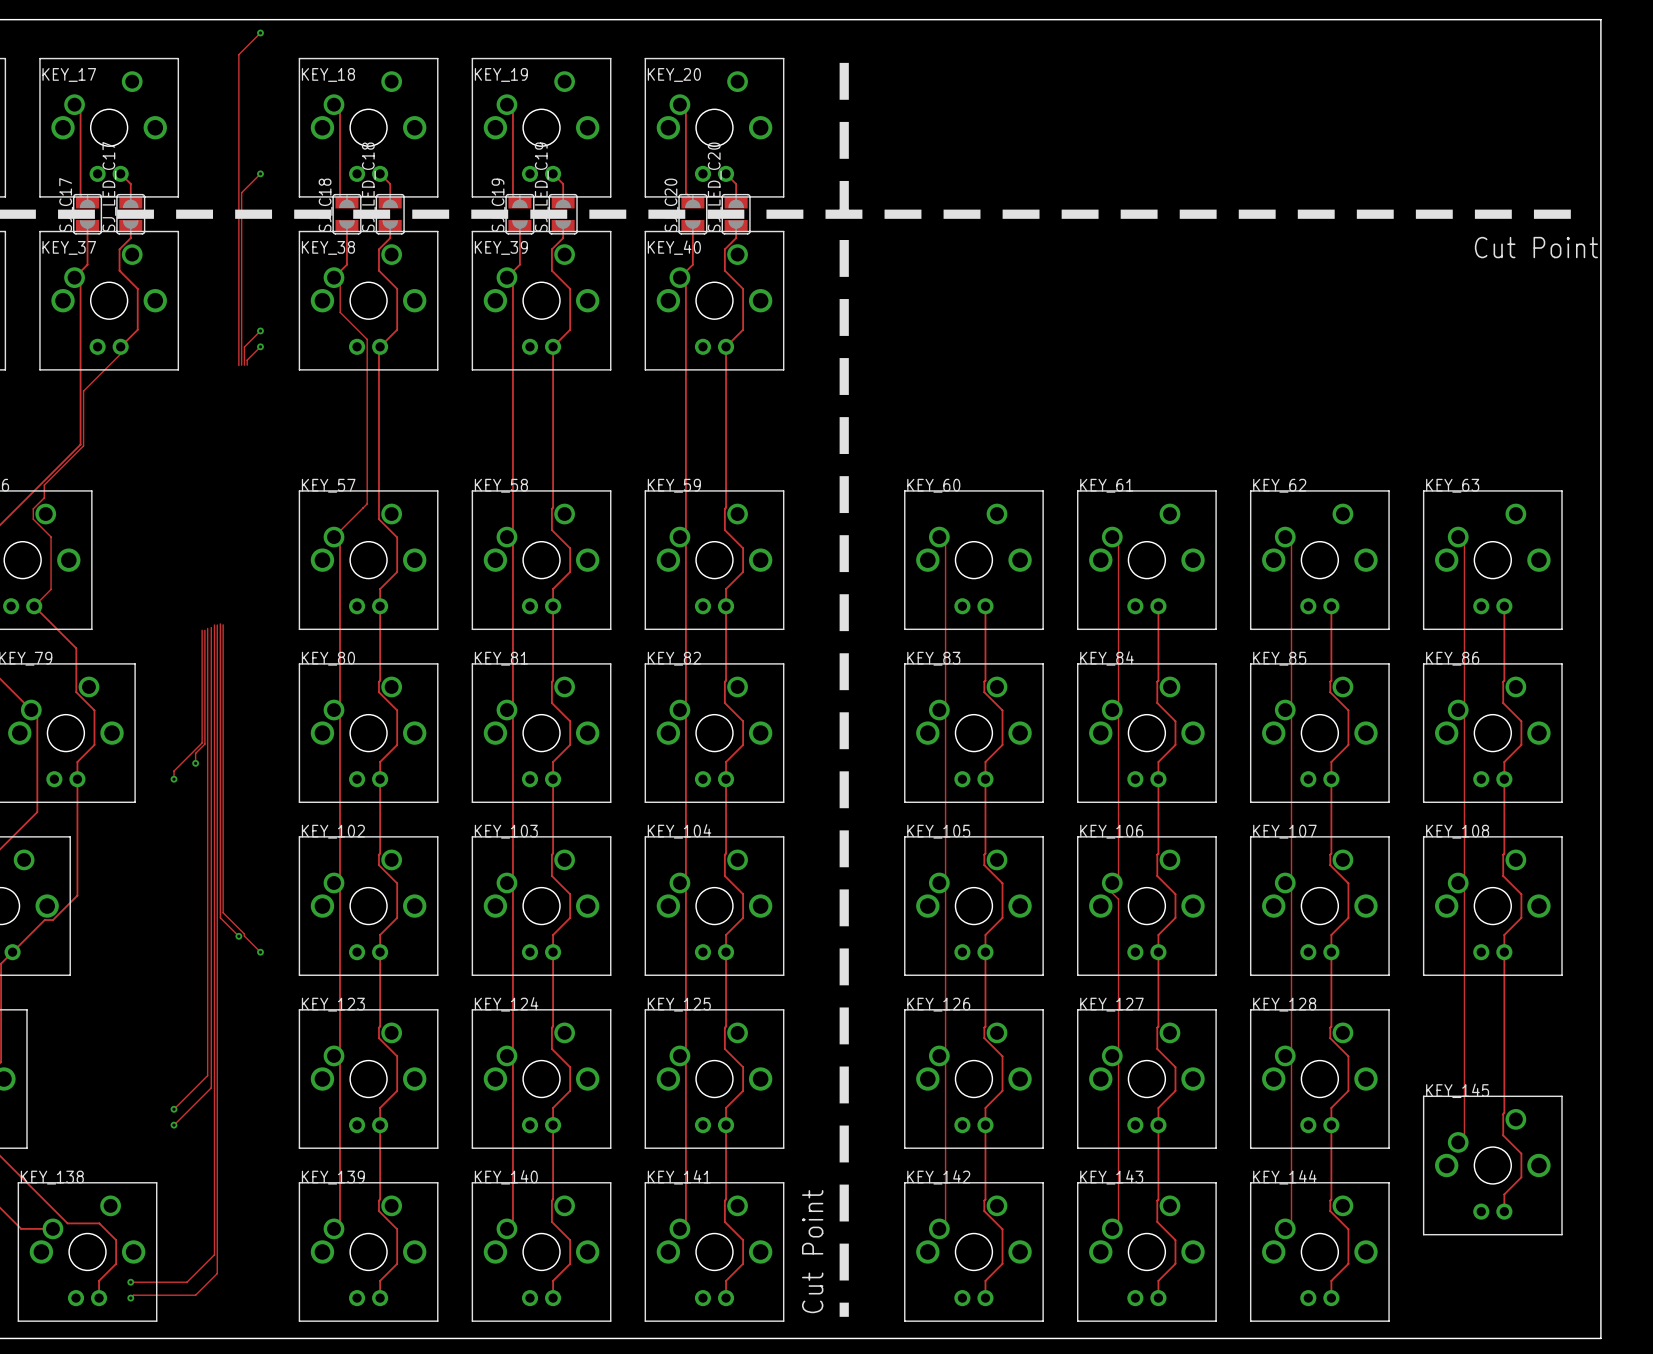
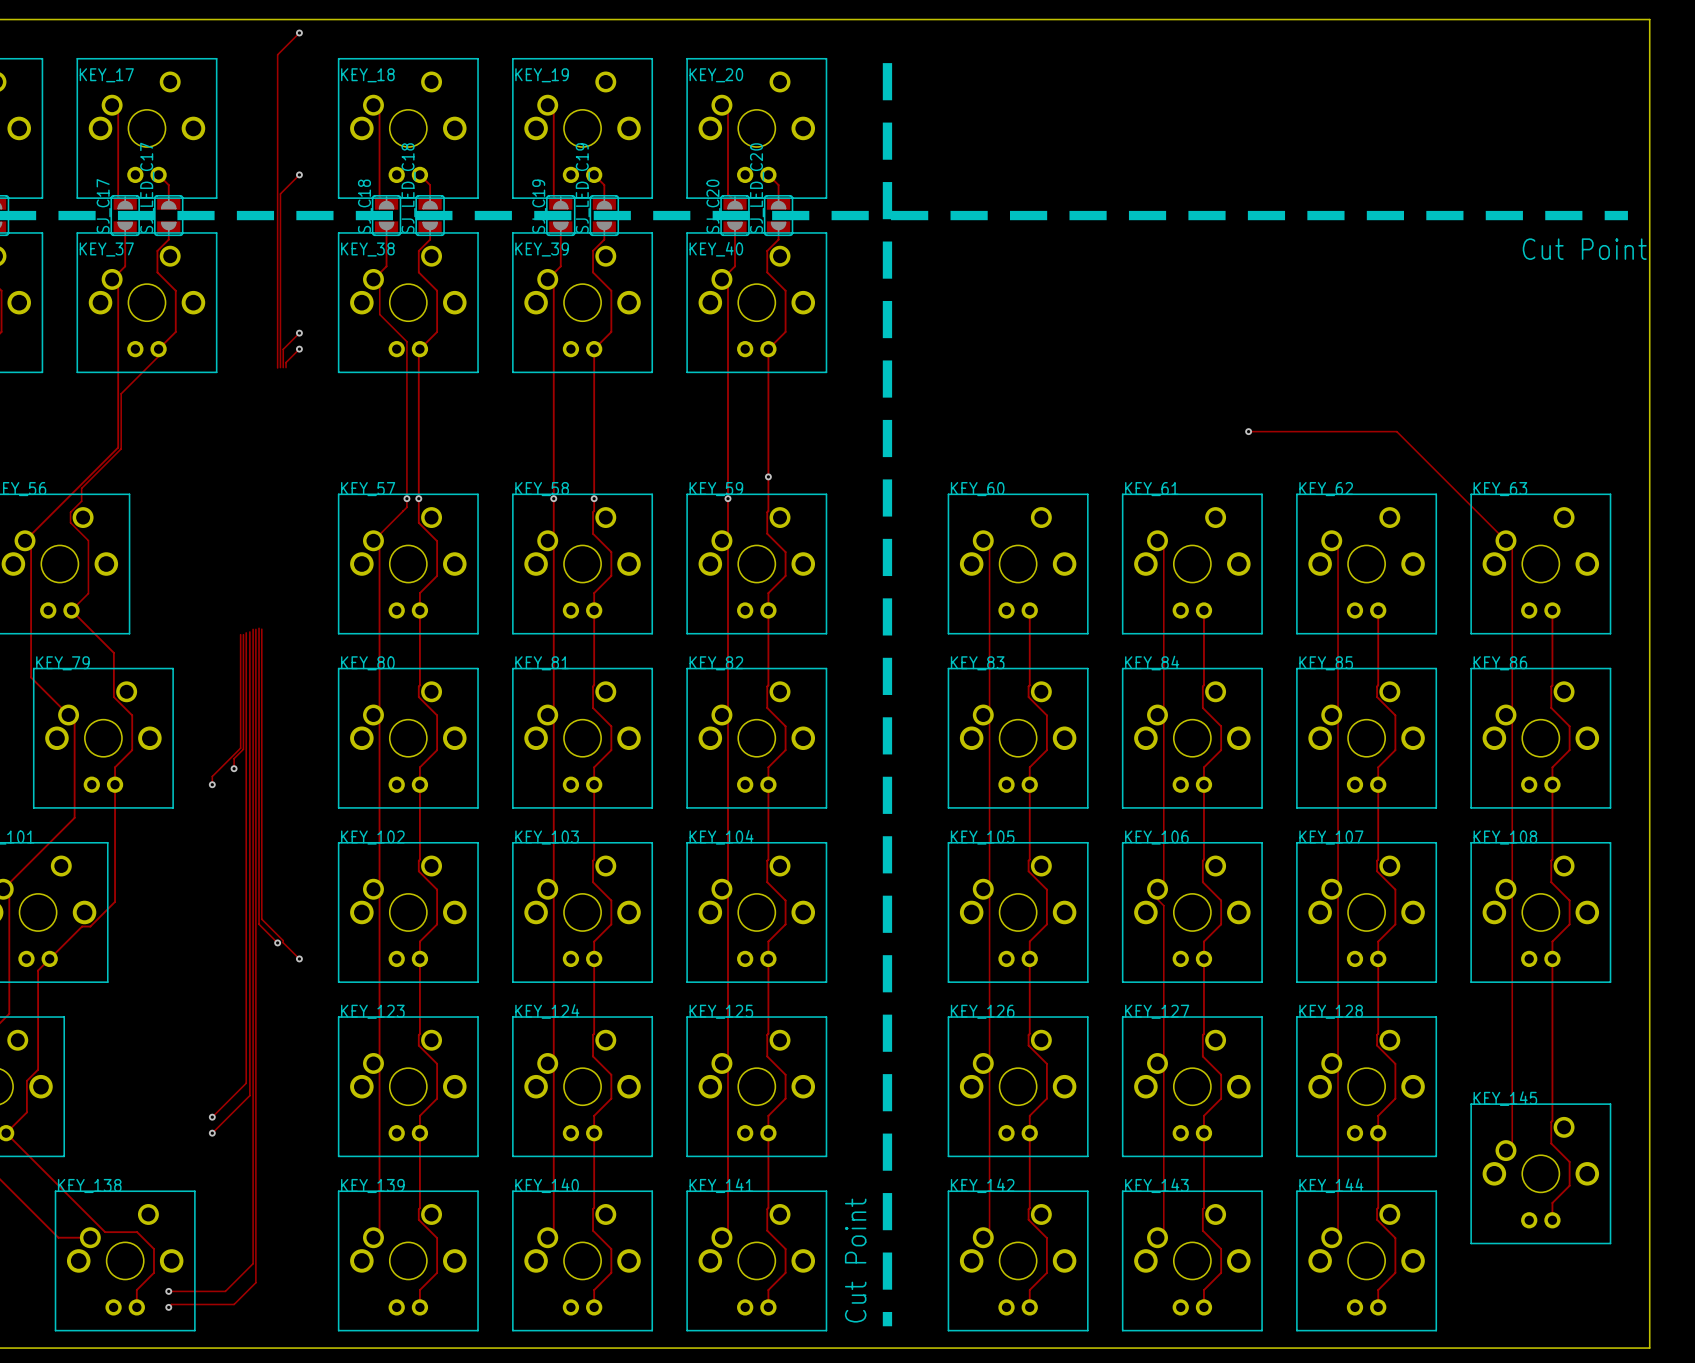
track: none -> (1248, 431) (1396, 431) (1505, 540)
via: none -> (1248, 431)
via: none -> (768, 476)
via: none -> (406, 498)
via: none -> (418, 498)
via: none -> (553, 498)
via: none -> (594, 498)
via: none -> (727, 498)

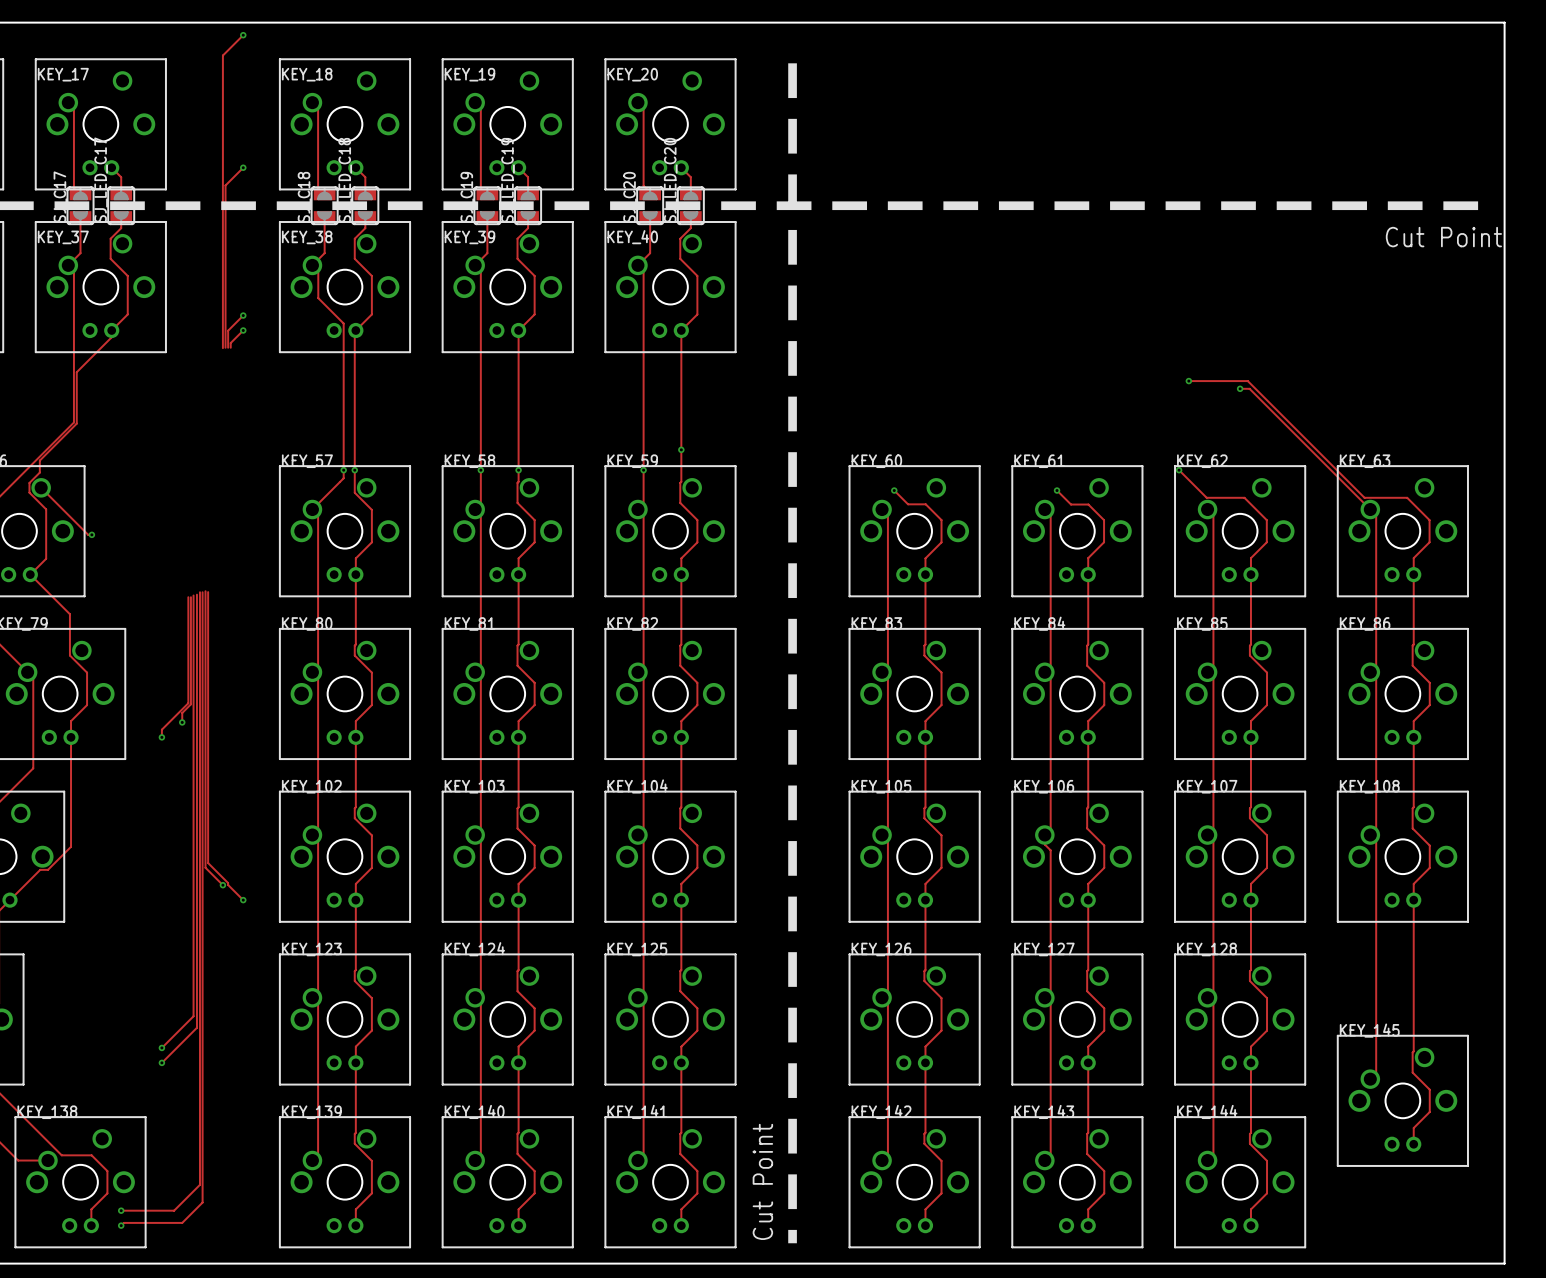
track: none -> (1188, 381) (1247, 381) (1364, 497) (1407, 497) (1429, 520) (1429, 542) (1413, 558) (1413, 574)
via: none -> (1188, 381)
via: none -> (1240, 388)
track: (1248, 431) (1396, 431) -> (1240, 388) (1249, 388) (1268, 407)
via: (1248, 431) -> none
track: none -> (1179, 470) (1206, 497) (1244, 497) (1266, 520) (1266, 542) (1250, 558) (1250, 574)
via: none -> (1179, 470)
track: none -> (41, 487) (88, 534) (91, 534)
track: none -> (894, 490) (908, 504) (925, 504) (941, 520) (941, 542) (925, 558) (925, 574)
via: none -> (894, 490)
track: none -> (1057, 490) (1071, 504) (1088, 504) (1104, 520) (1104, 542) (1088, 558) (1088, 574)
via: none -> (1057, 490)
via: none -> (91, 534)

